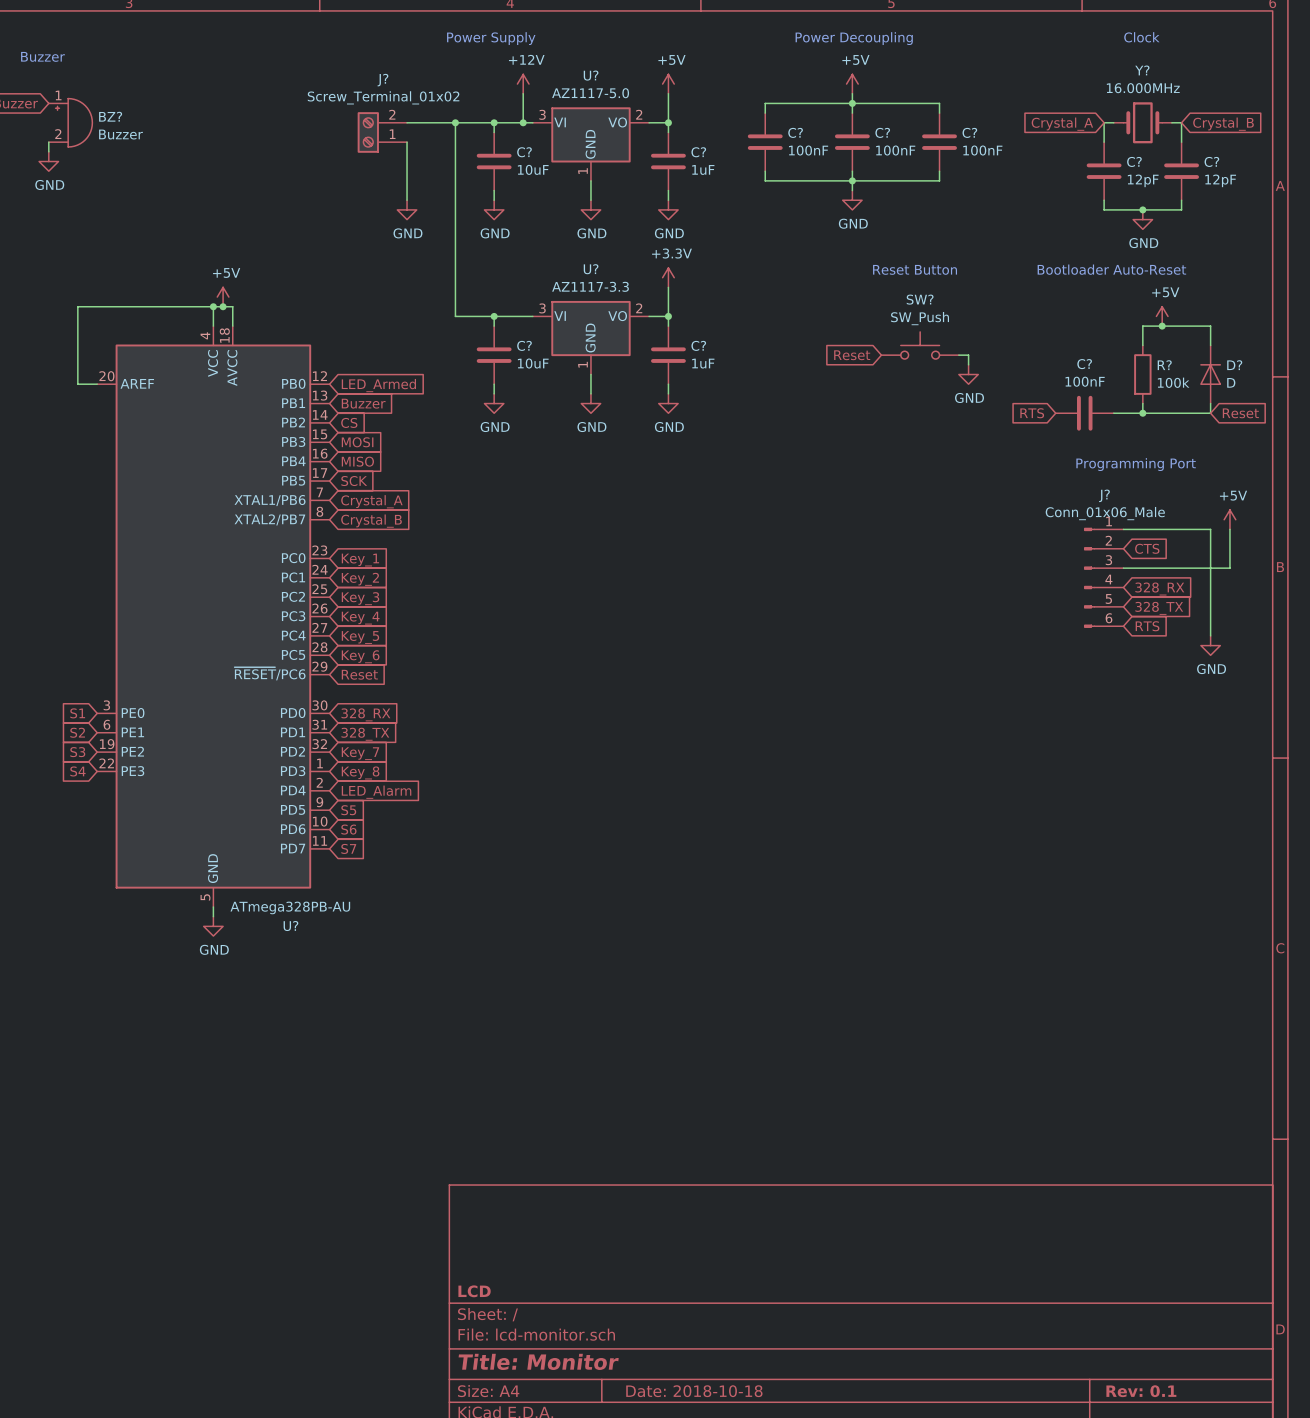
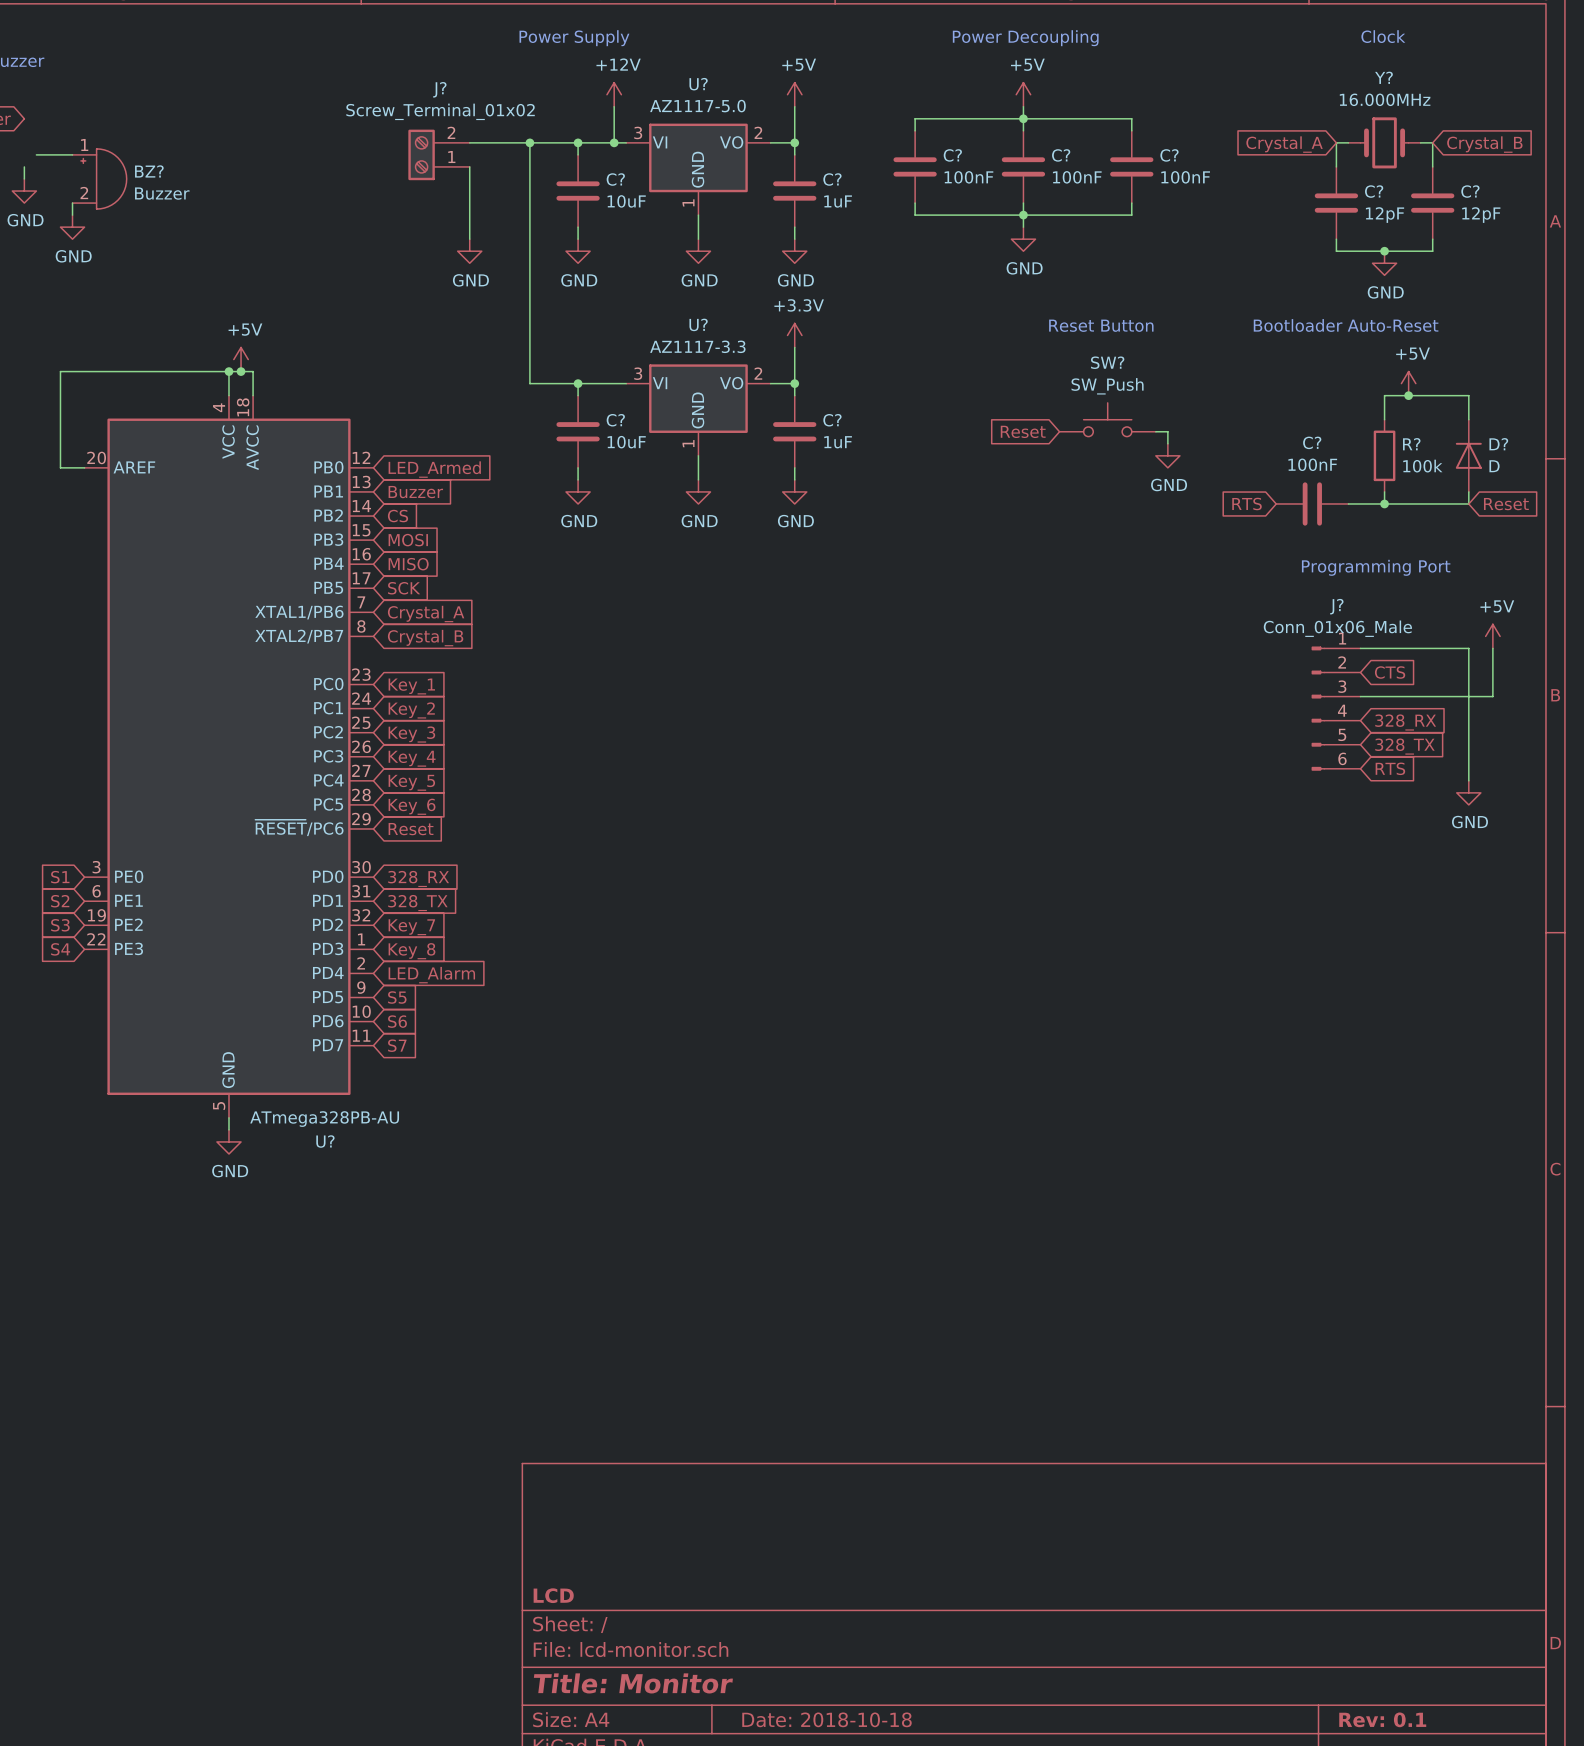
BZ? position: (70, 122) -> (99, 178)
wire: none -> (36, 154) (72, 154)
wire: none -> (72, 203) (72, 215)
power symbol: none -> GND (72, 227)

